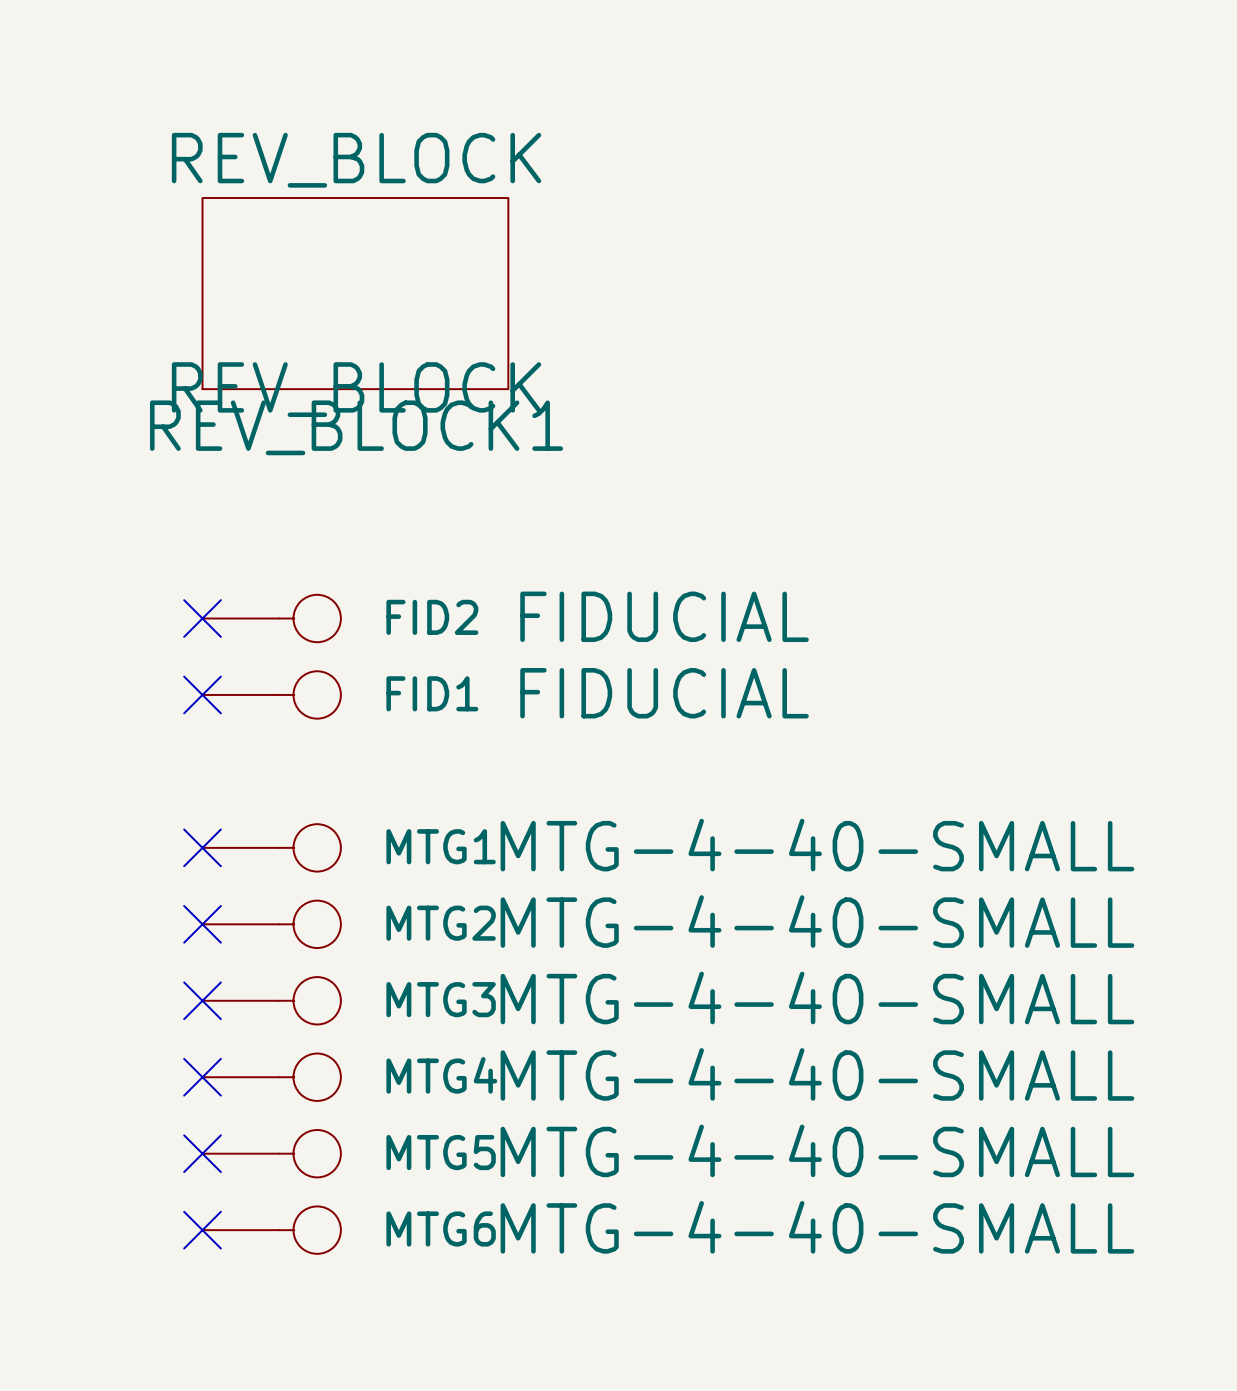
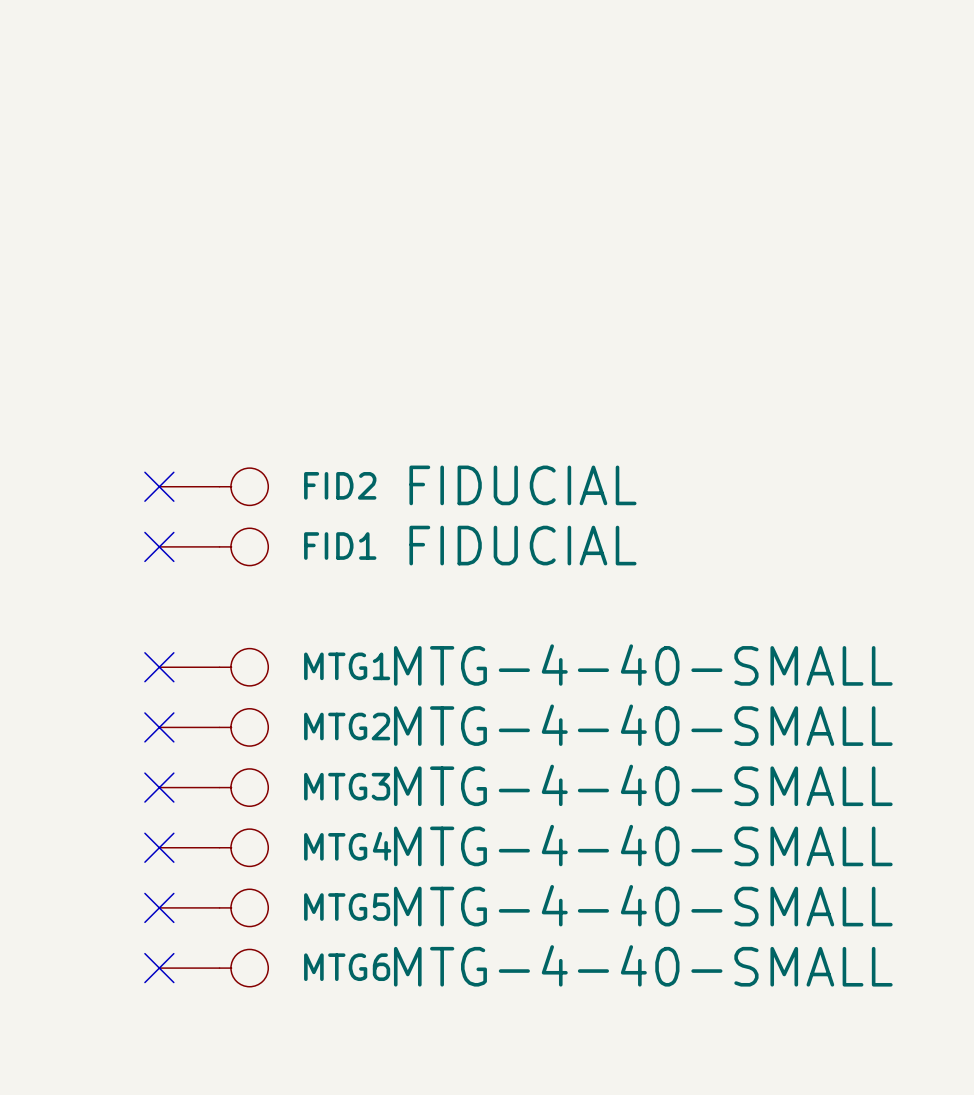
REV_BLOCK1: REV_BLOCK (355, 293) -> none

